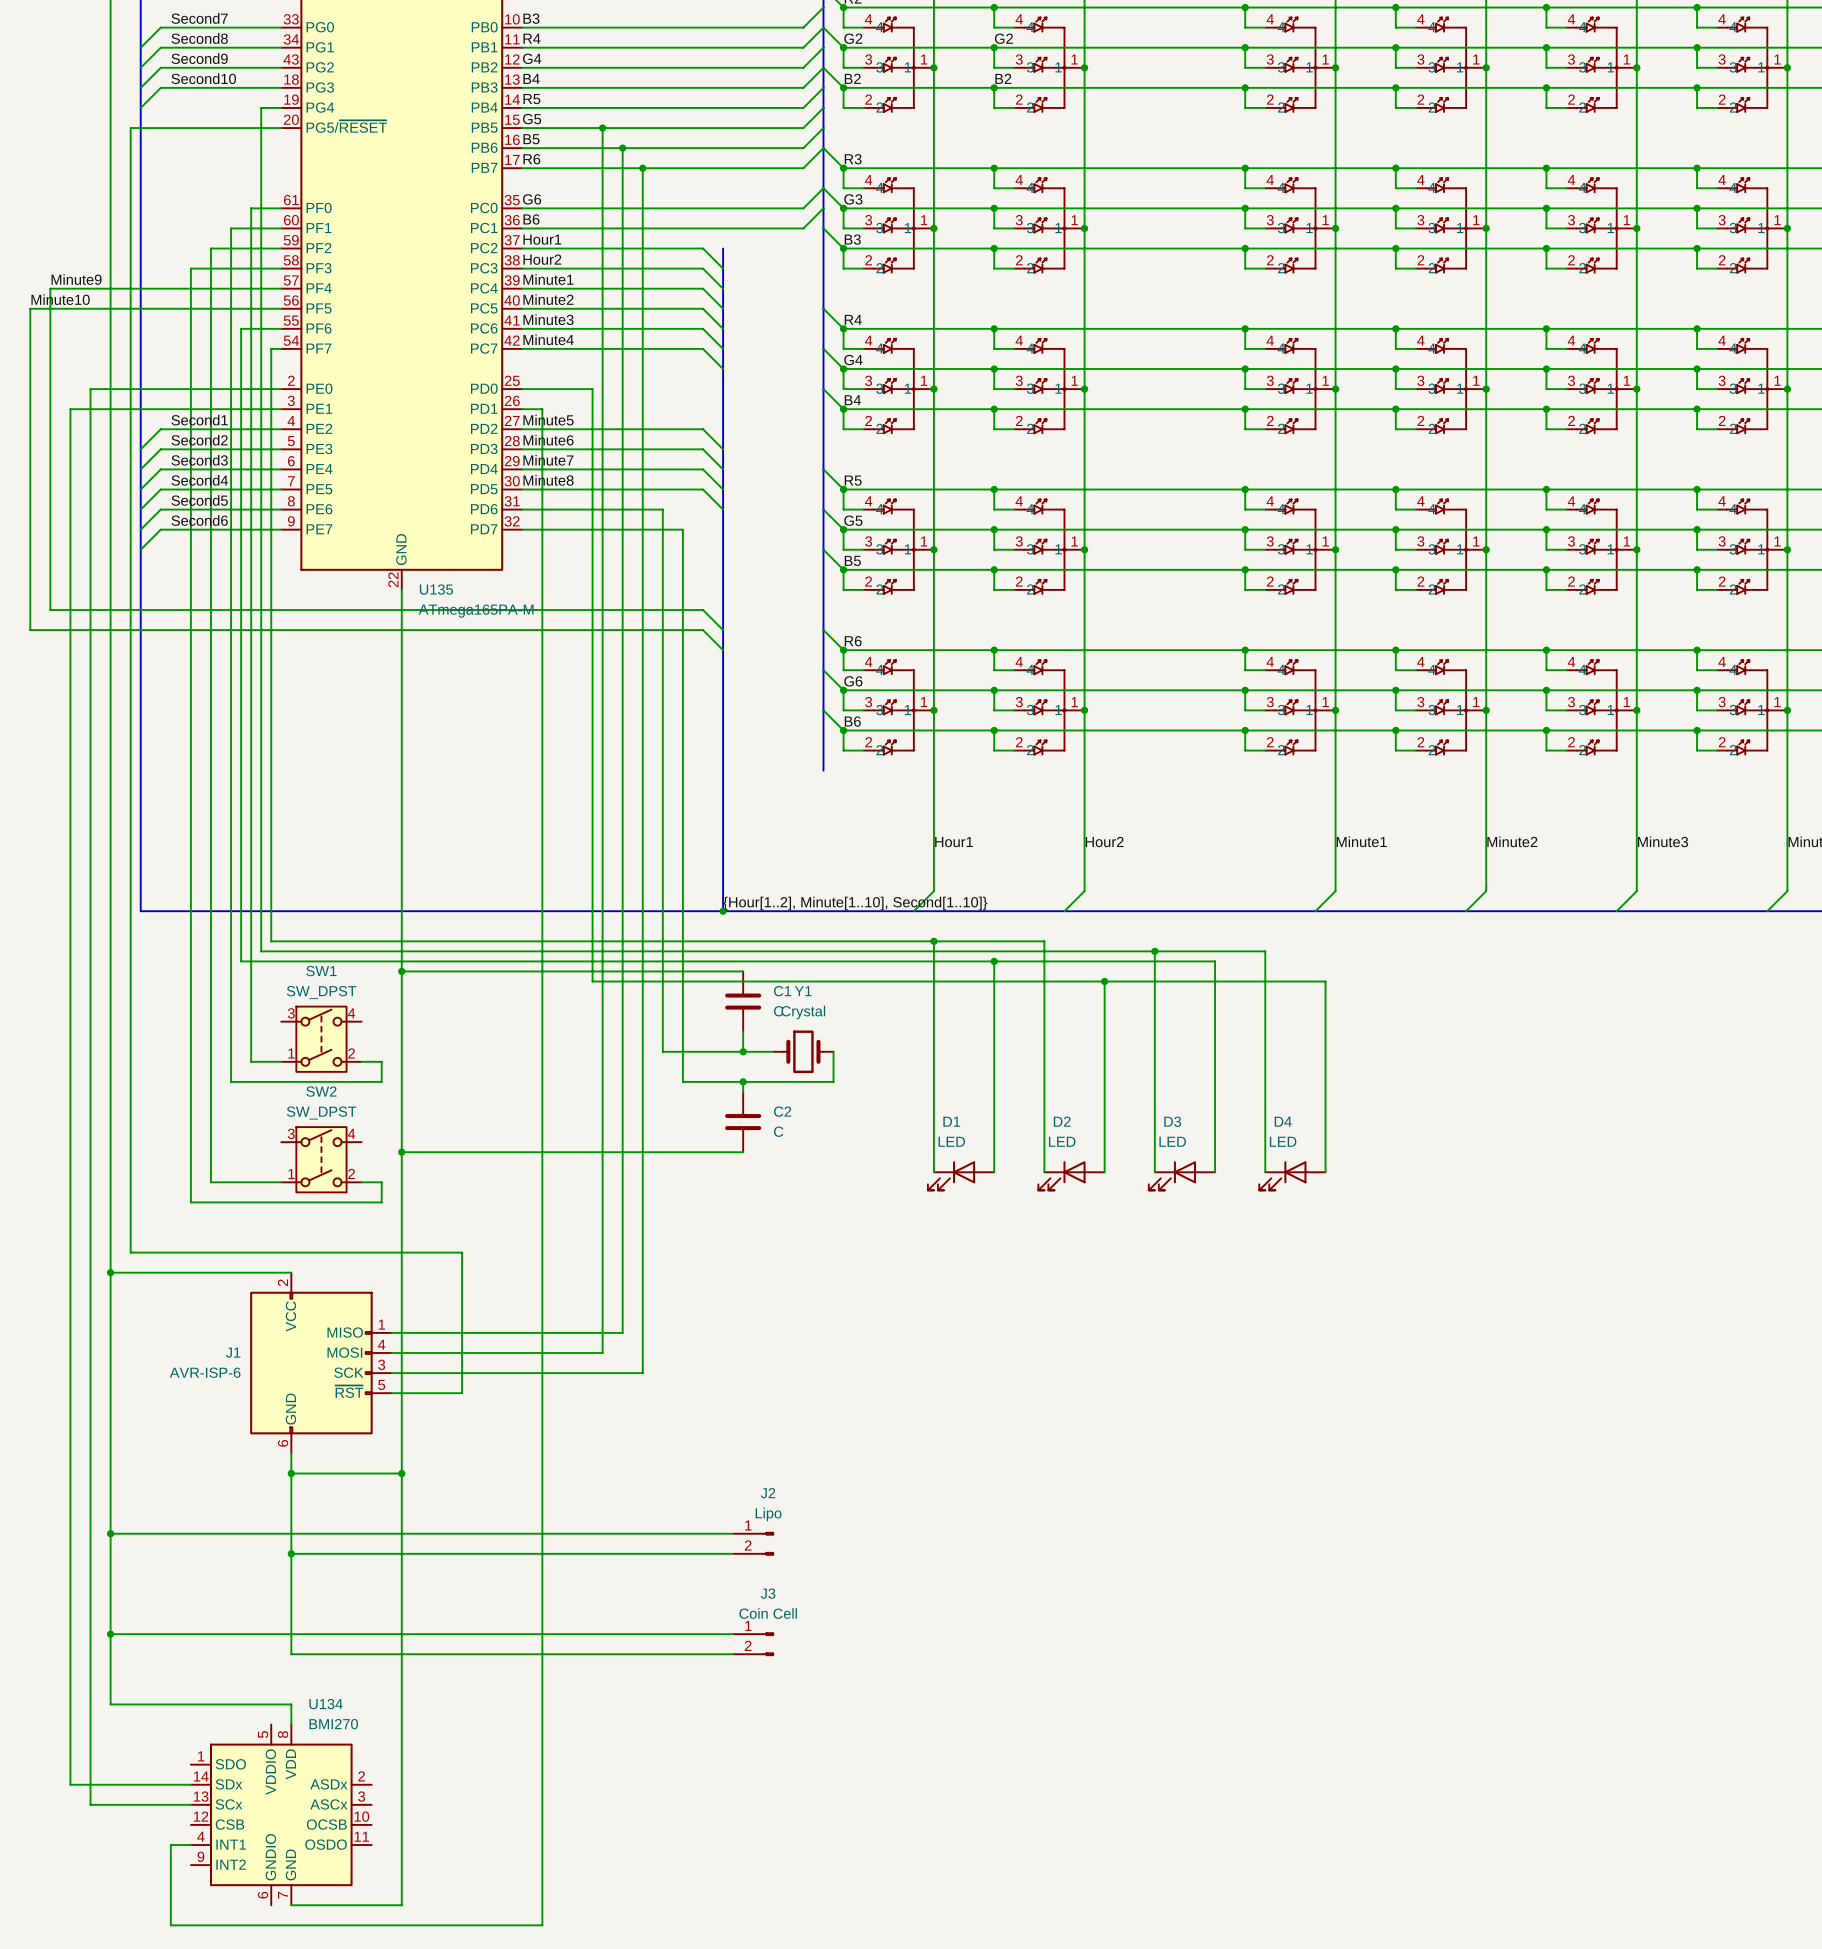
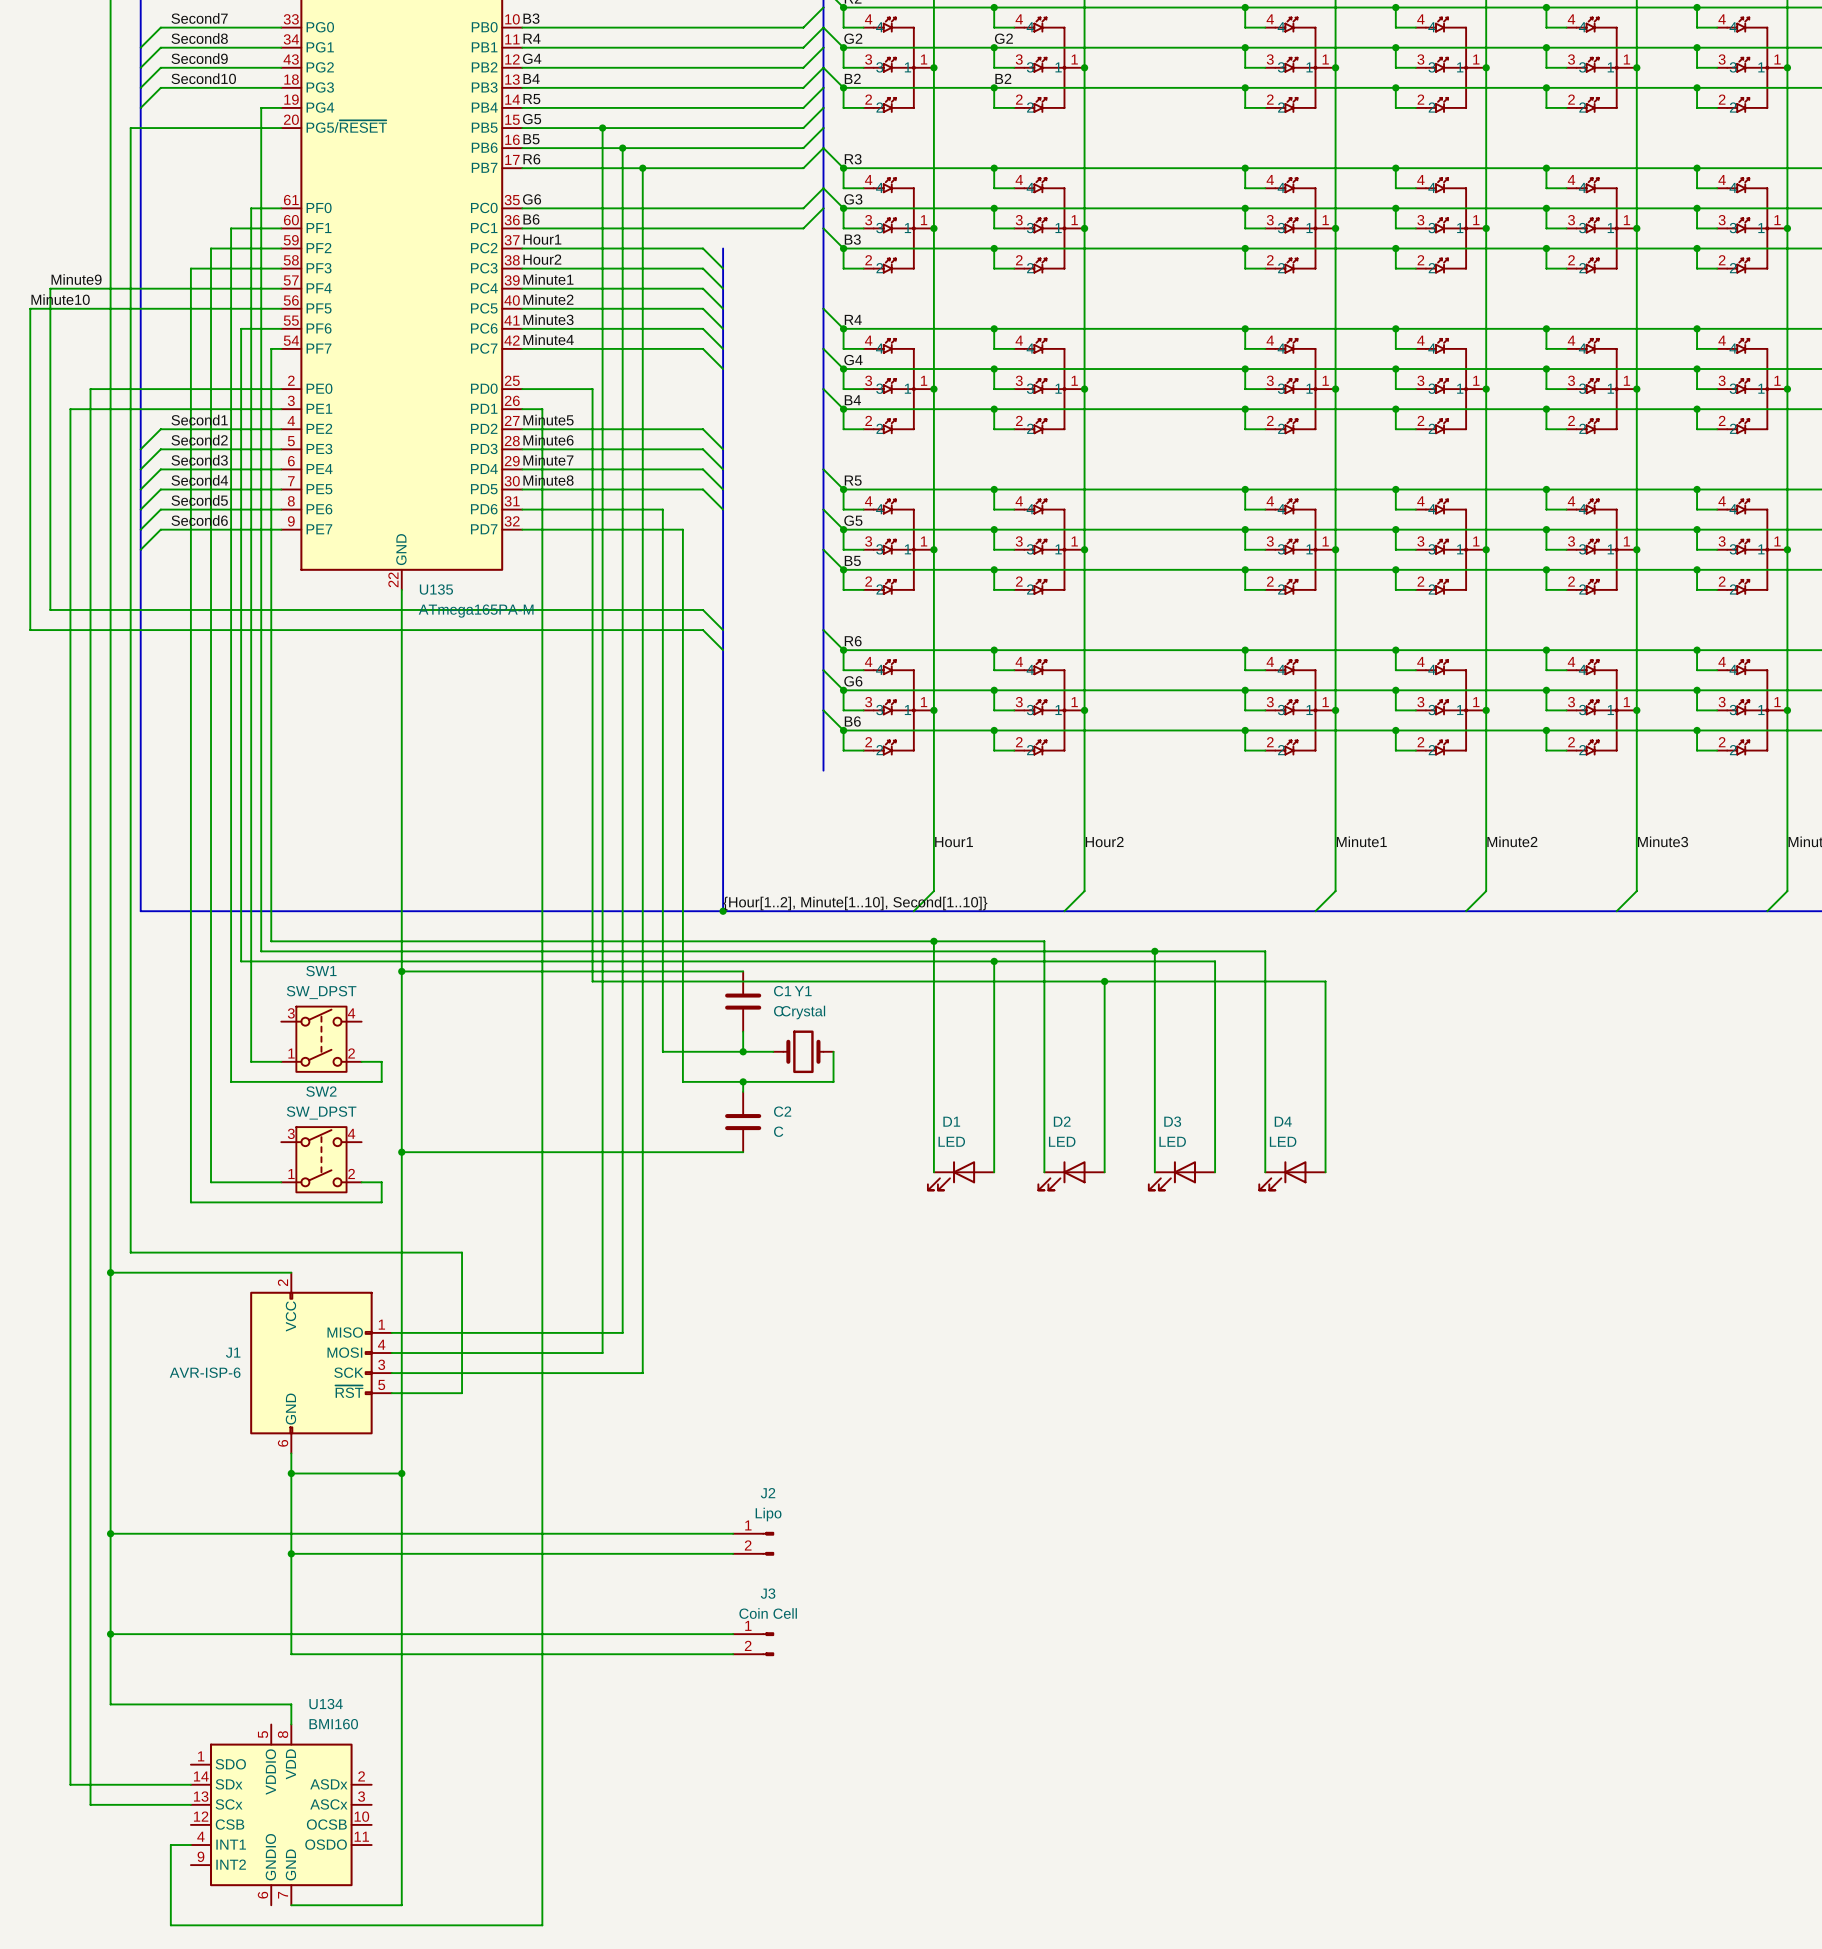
U134 value: BMI270 (333, 1724) -> BMI160 (333, 1724)

